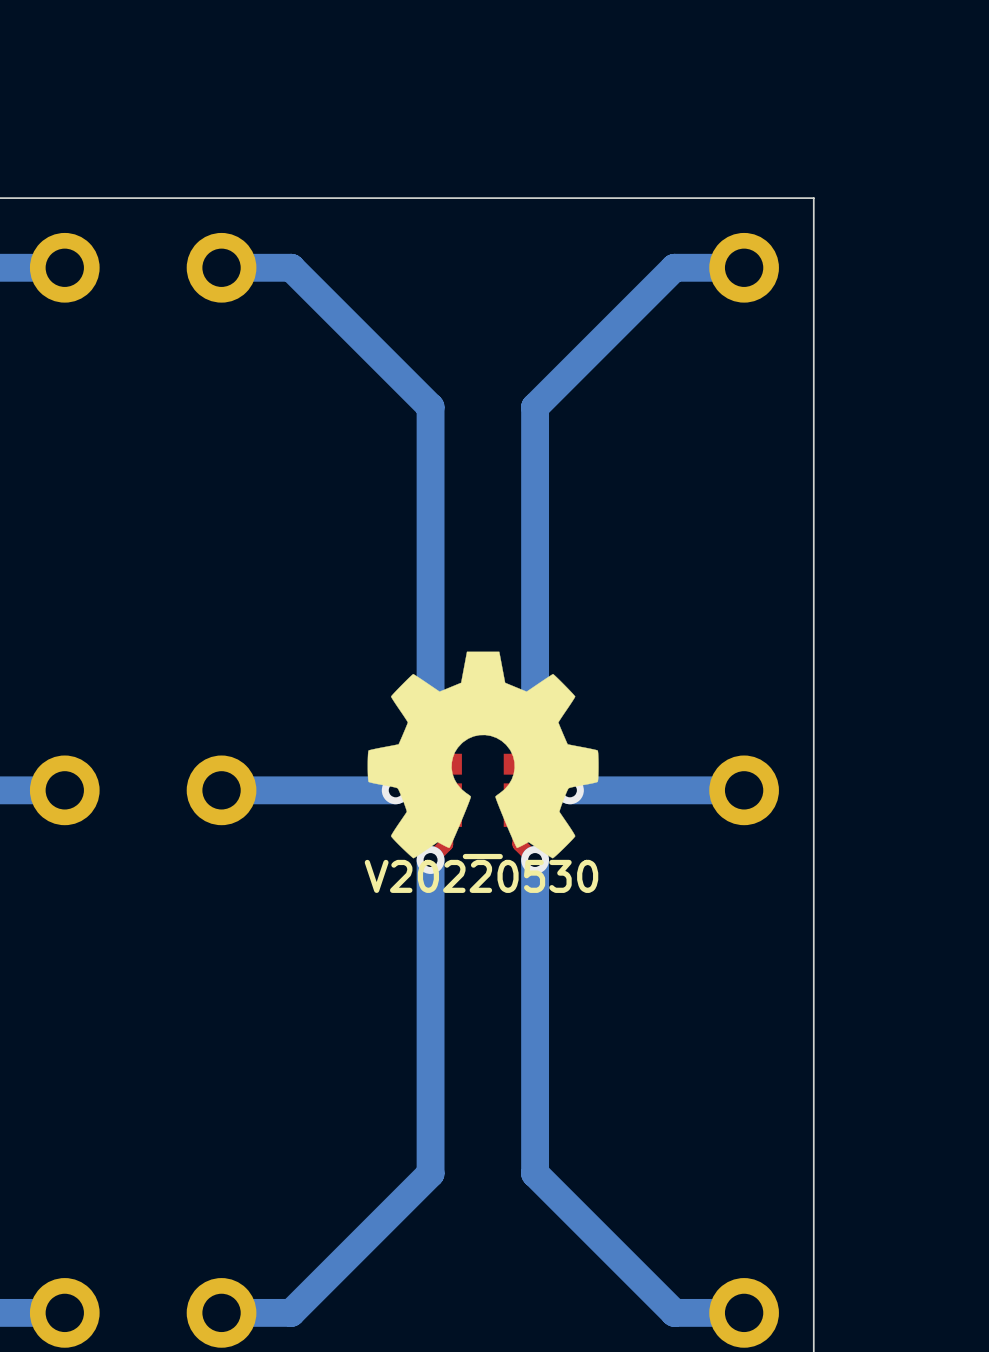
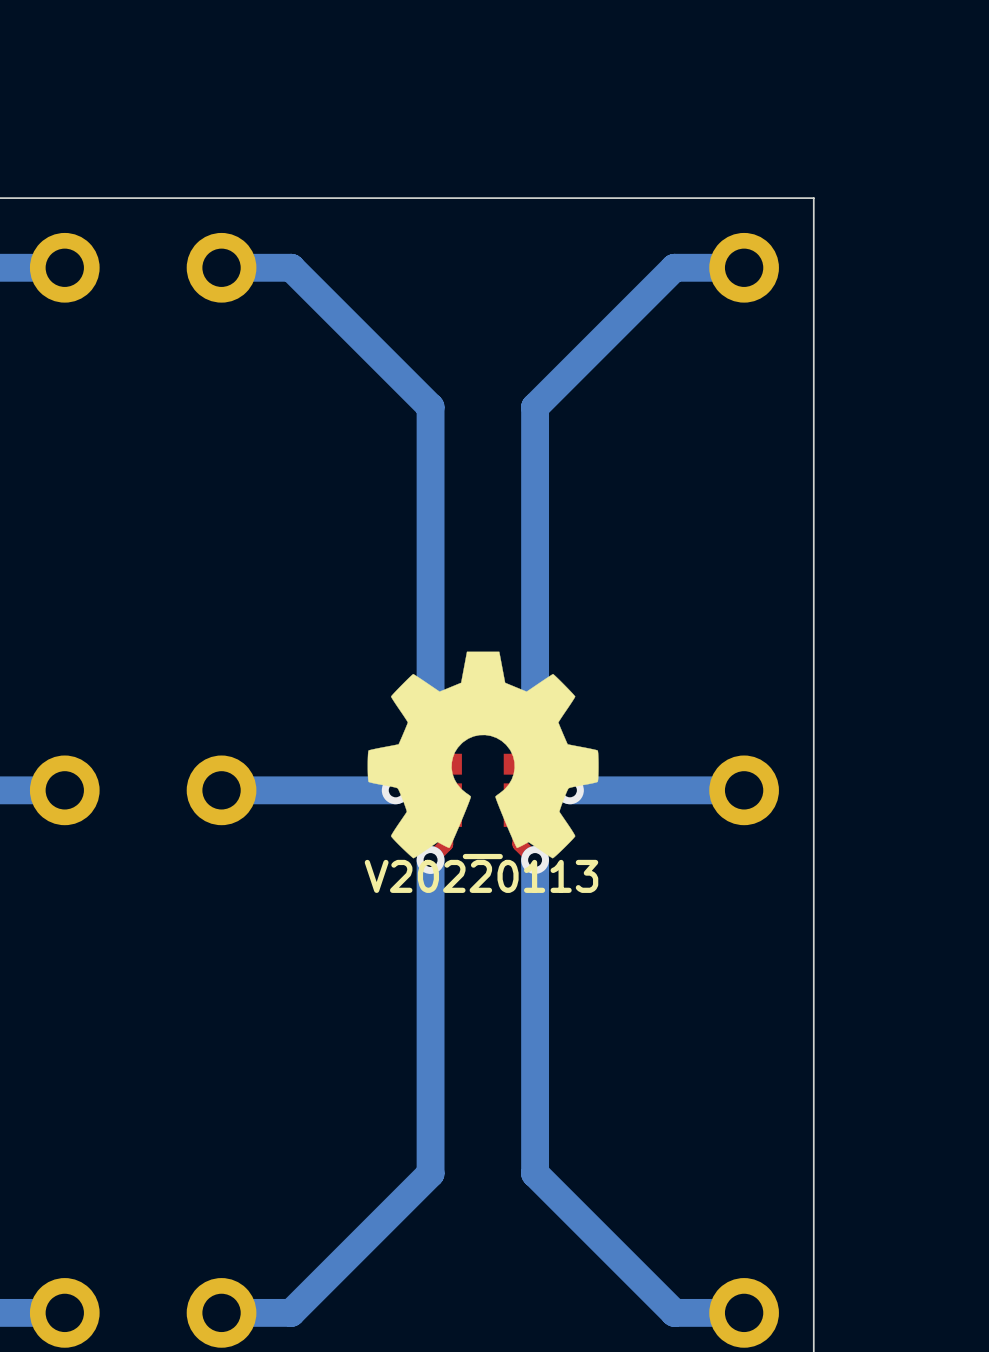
drawing shape: [364, 853, 599, 893] -> [364, 853, 599, 893]

